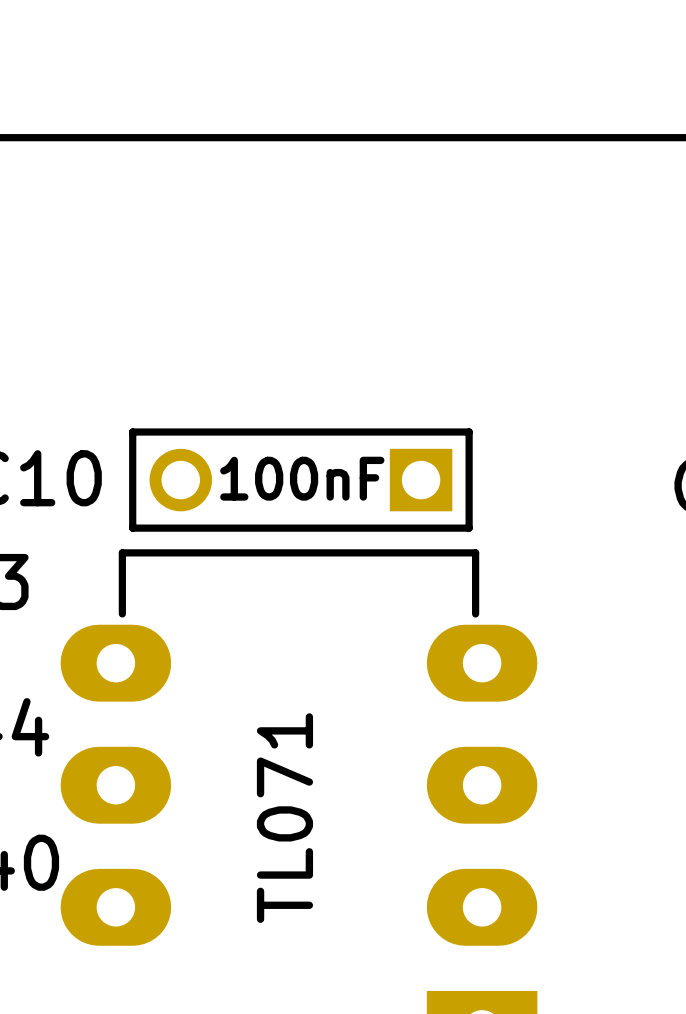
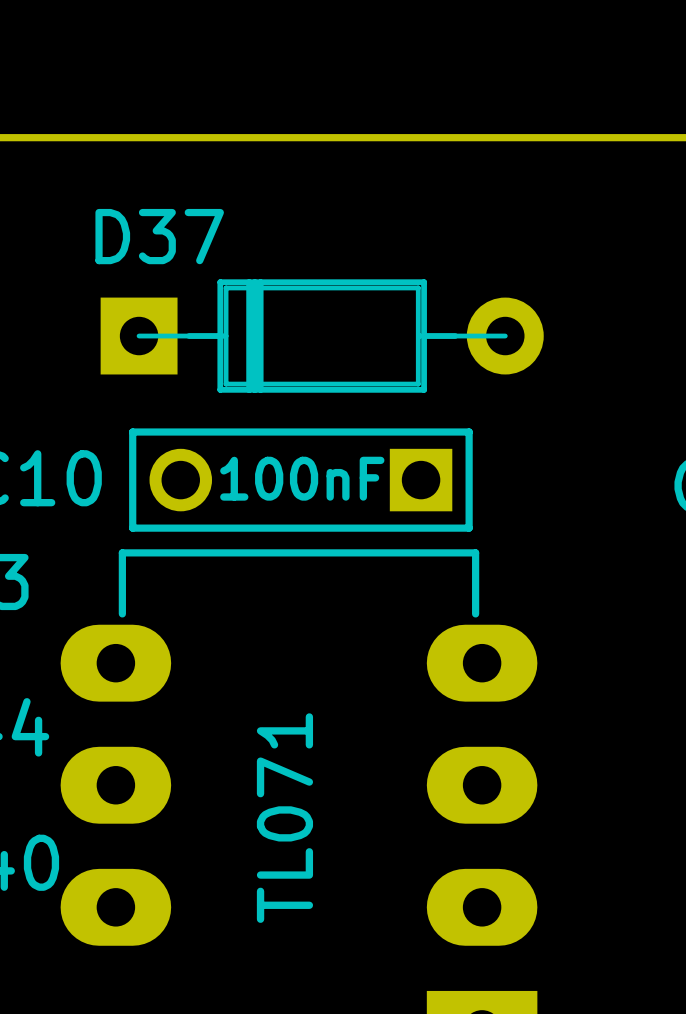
D37: none -> (322, 336)

